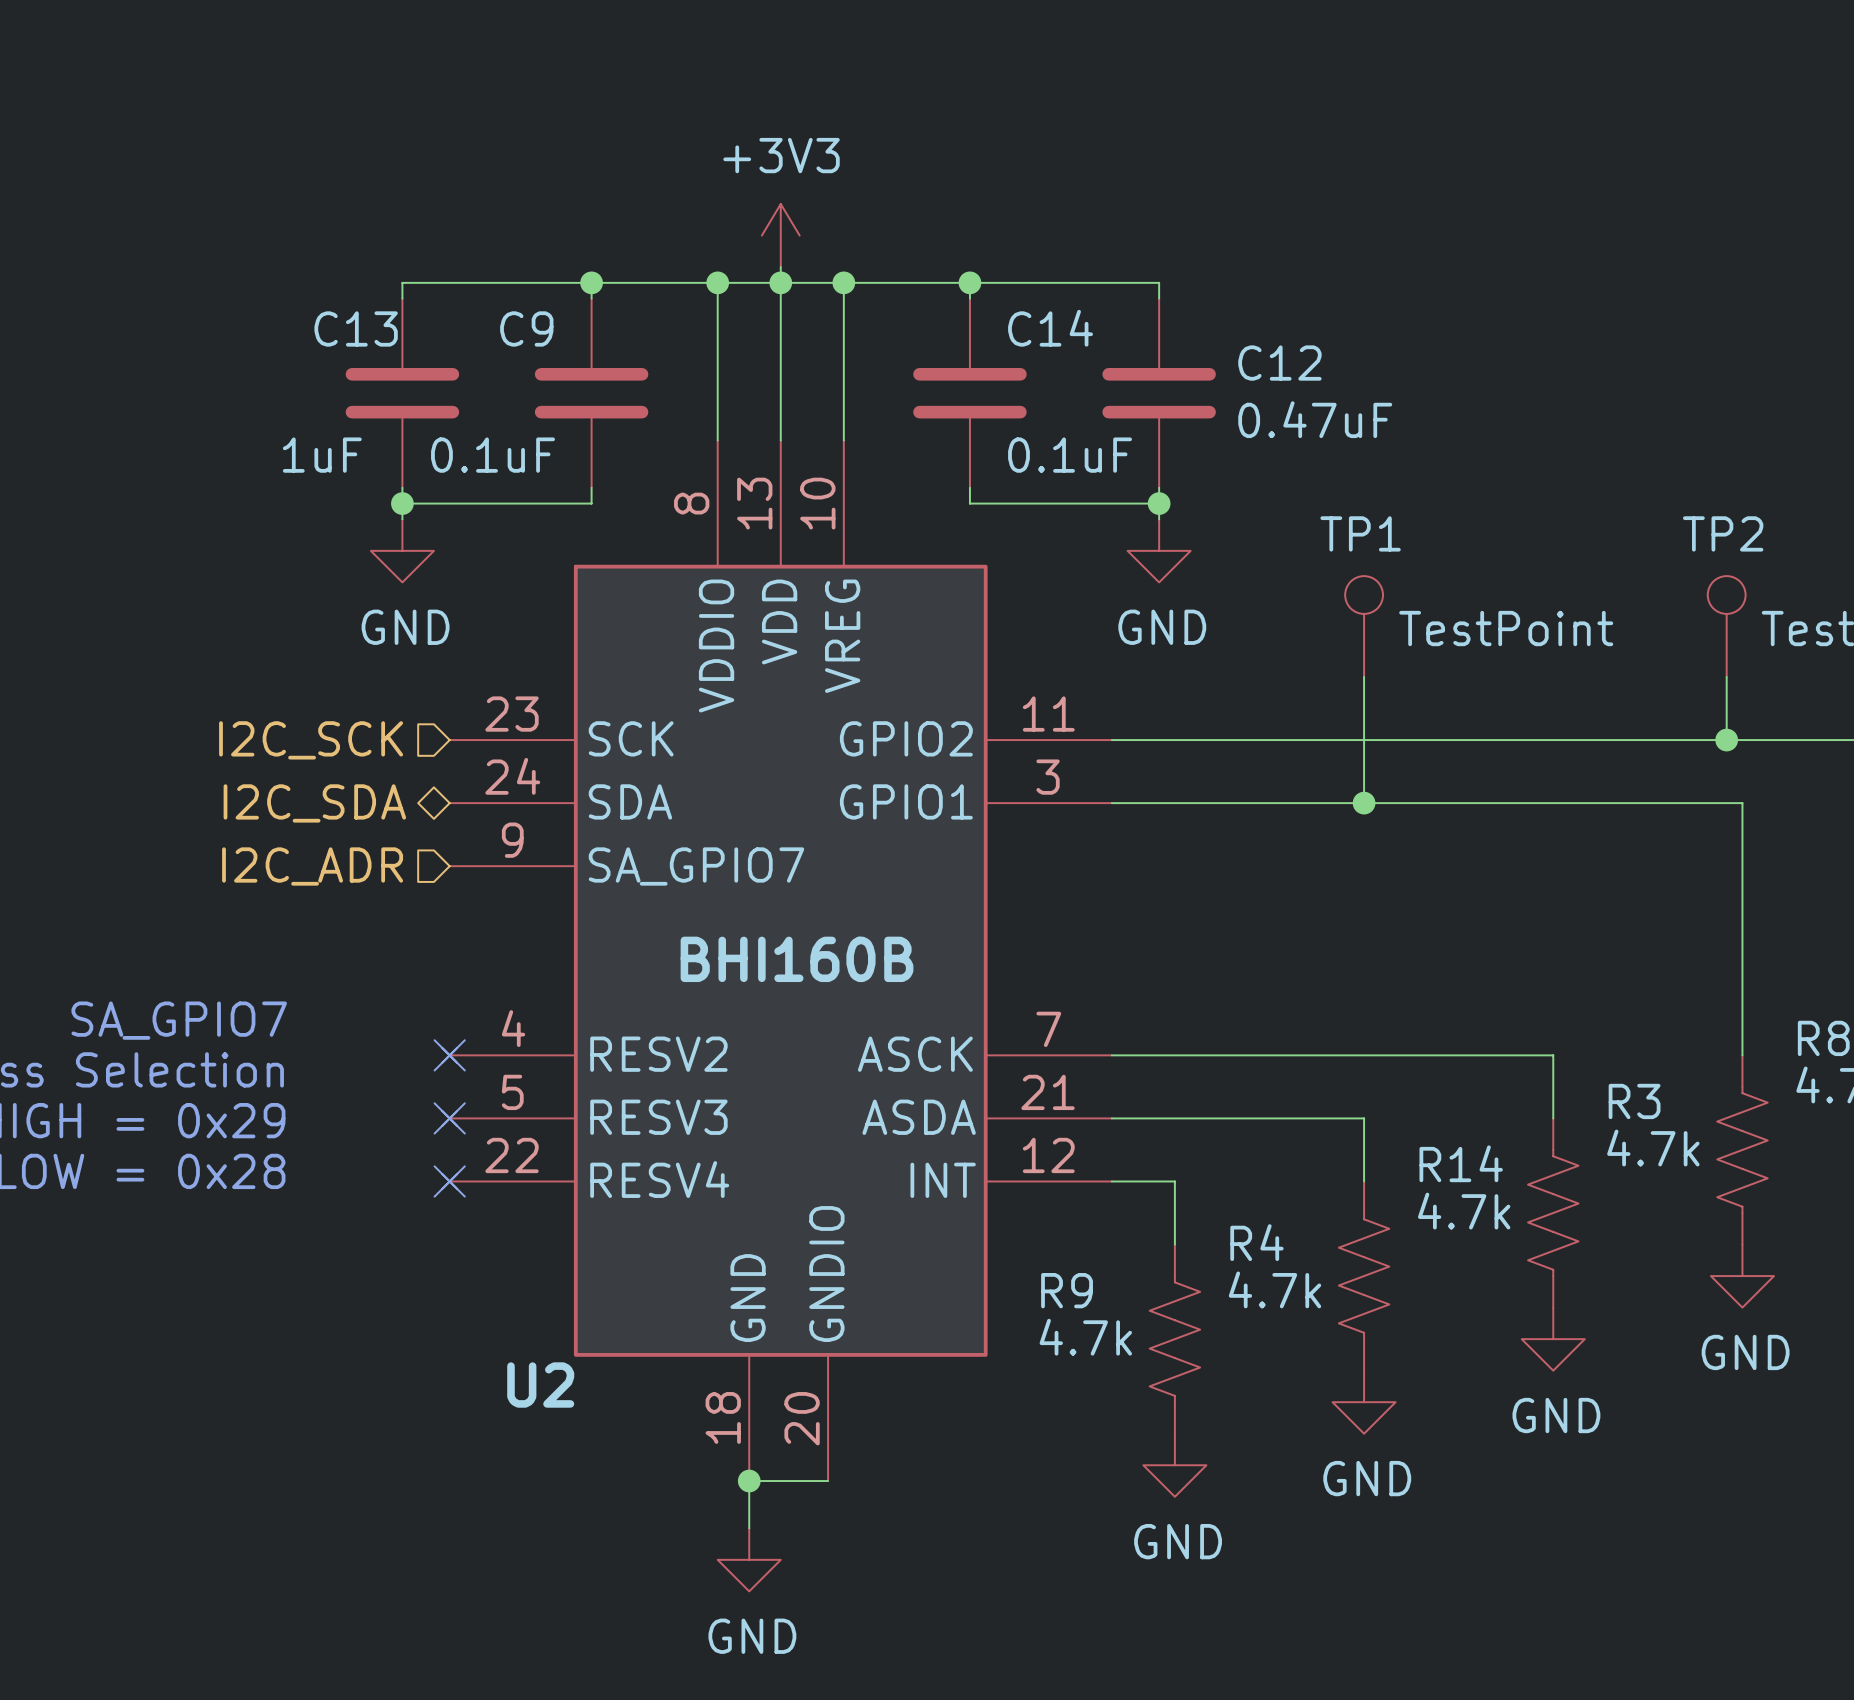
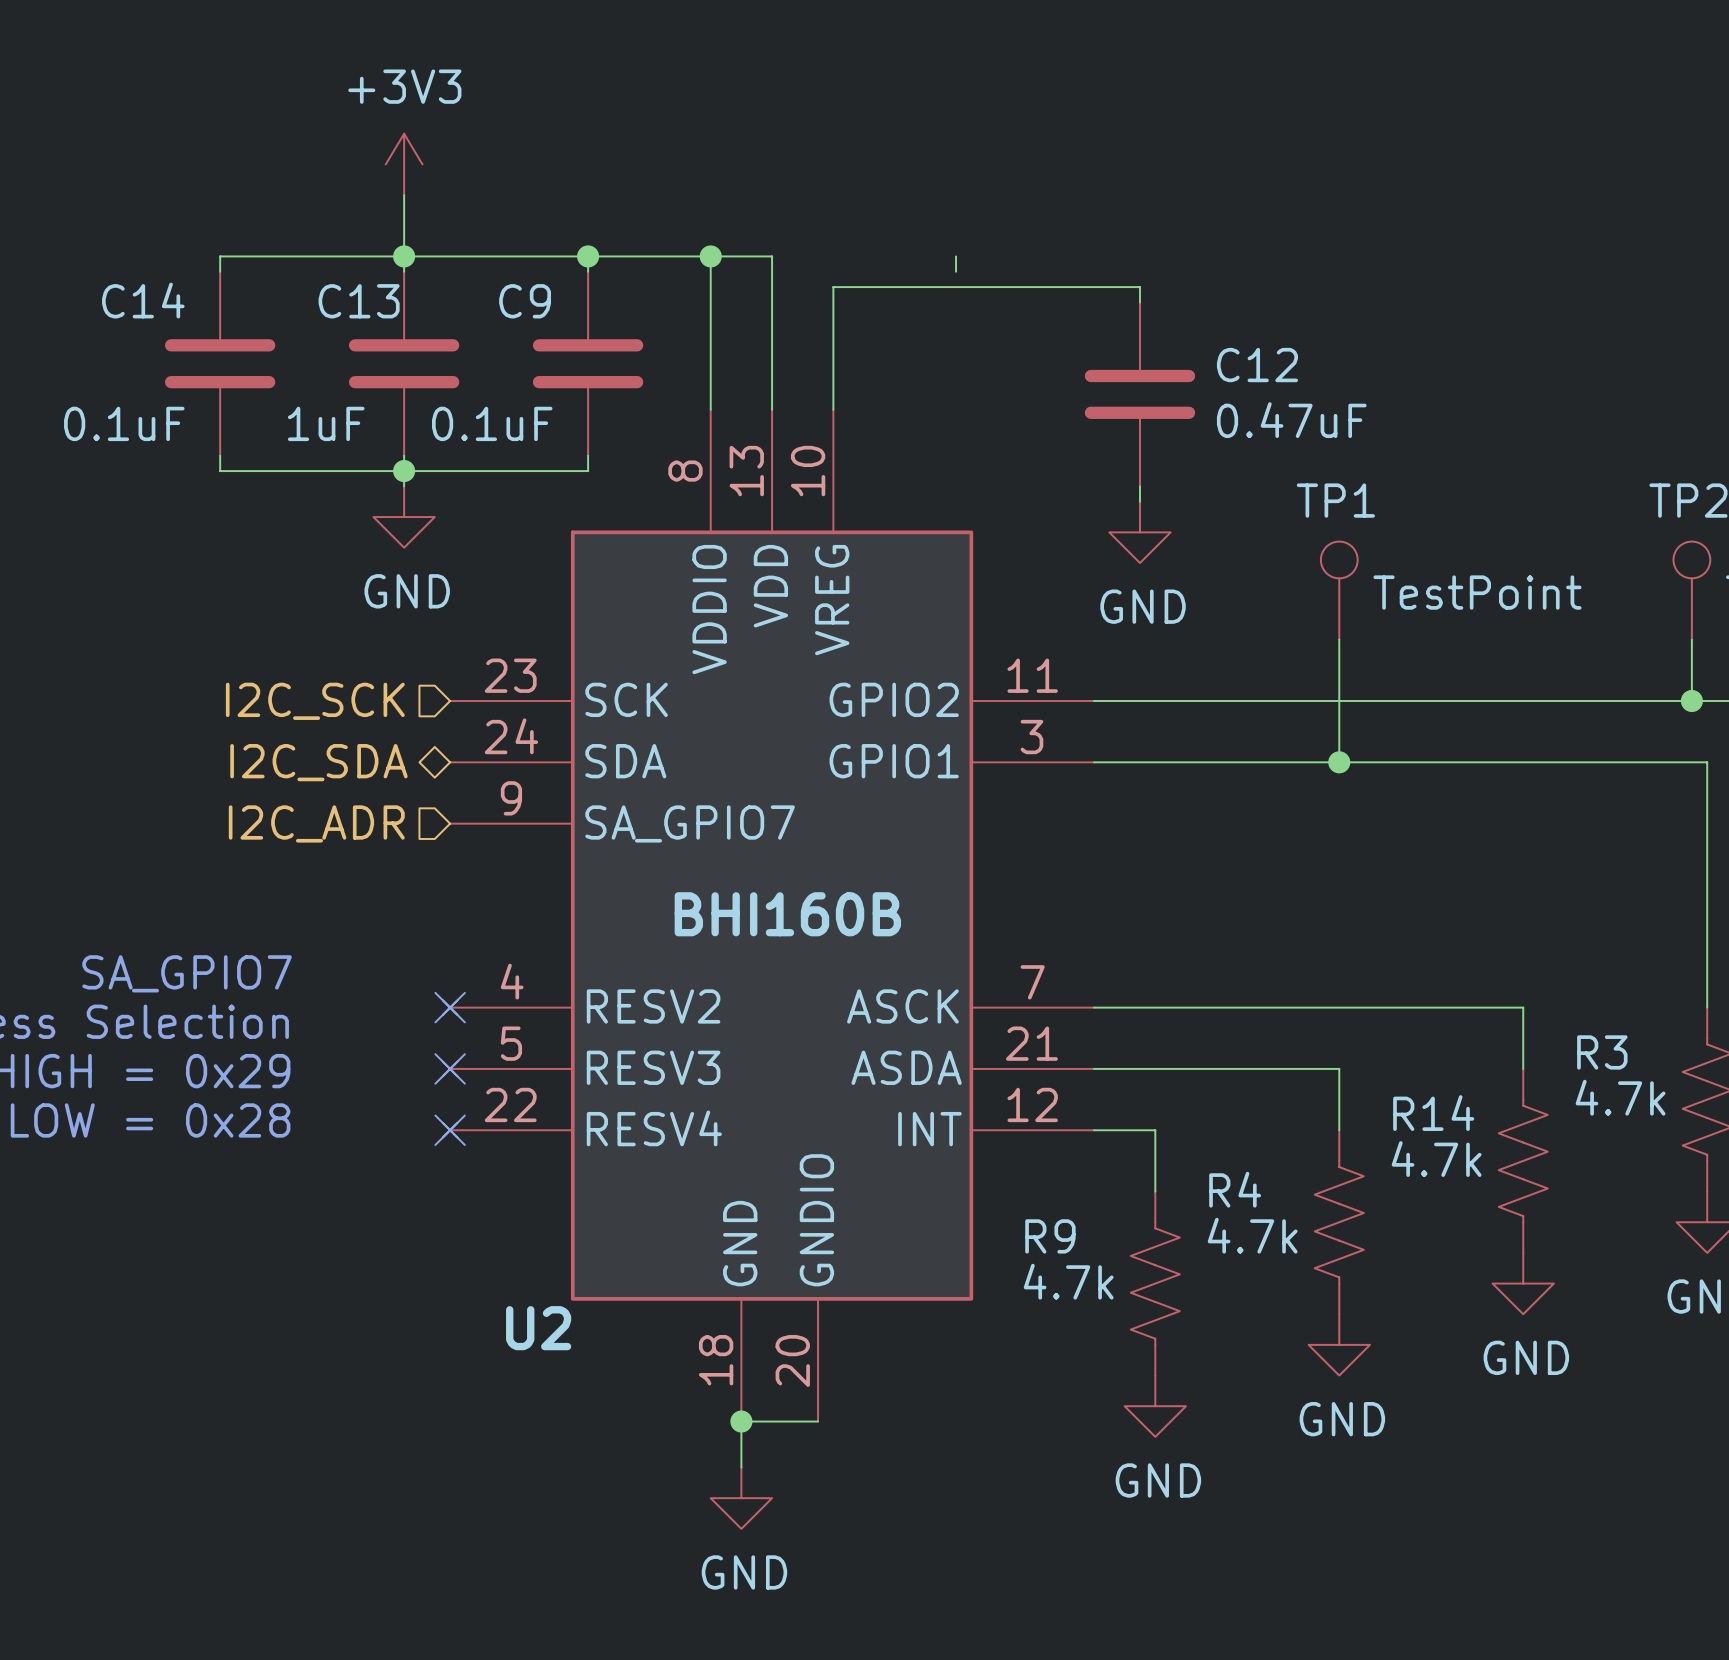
wire: none -> (404, 195) (404, 256) (220, 256) (220, 271)
power symbol position: +3V3 (780, 235) -> +3V3 (404, 164)
wire: (780, 267) (780, 282) (1159, 282) (1159, 298) -> none
junction: none -> (404, 256)
junction: (780, 282) -> none
wire: (843, 282) (843, 314) -> (1139, 302) (1139, 287) (833, 287)
junction: (843, 282) -> none
junction: (969, 282) -> none
C14 name position: C14 (1050, 328) -> C14 (143, 300)
C14 position: (969, 393) -> (220, 363)
C12 position: (1159, 393) -> (1139, 394)
C14 value position: 0.1uF (1070, 455) -> 0.1uF (124, 423)
wire: none -> (220, 455) (220, 471) (404, 471)
wire: (969, 487) (969, 503) (1159, 503) -> none
junction: (1159, 503) -> none
power symbol position: GND (1159, 550) -> GND (1139, 532)

